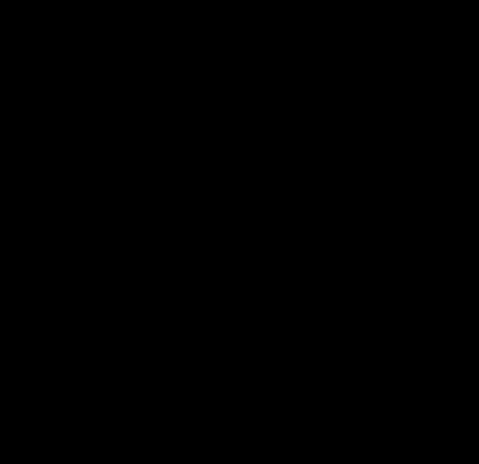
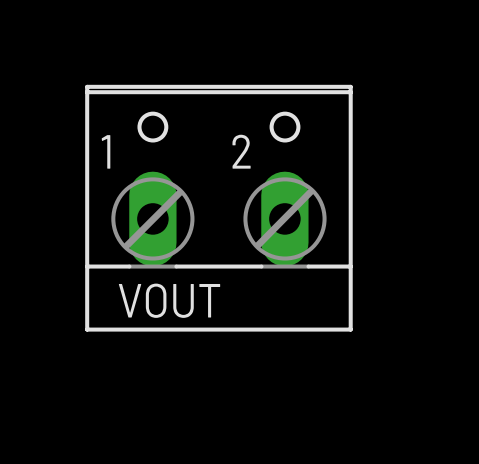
VOUT: none -> (218, 208)

